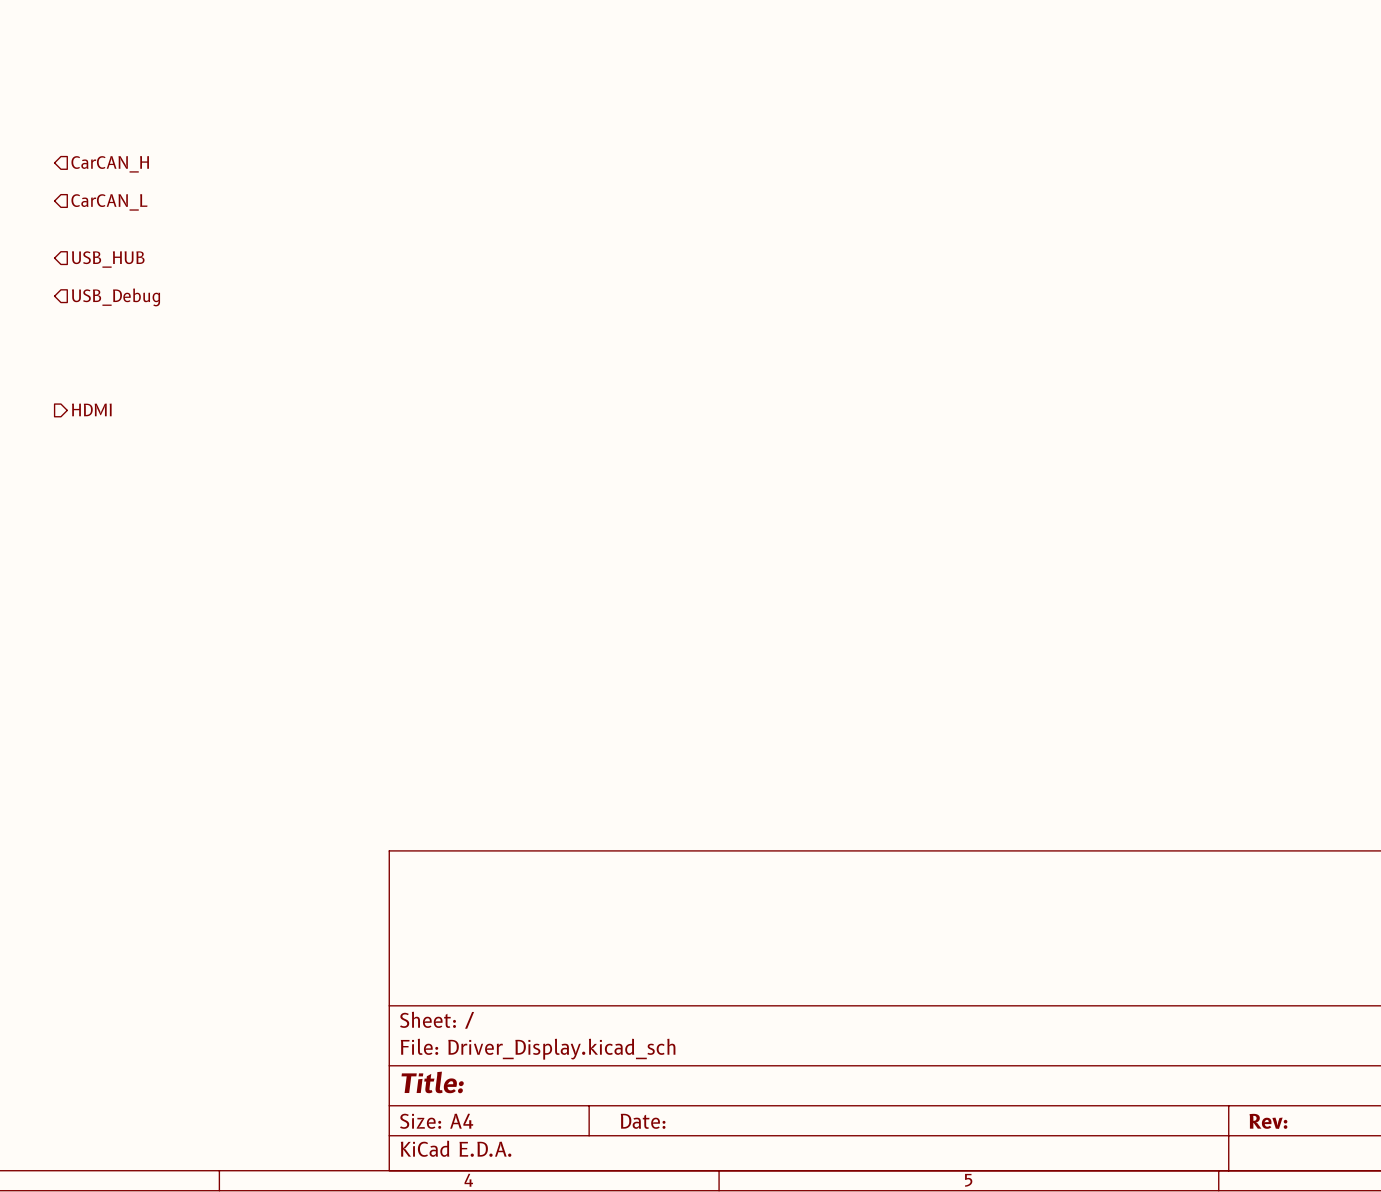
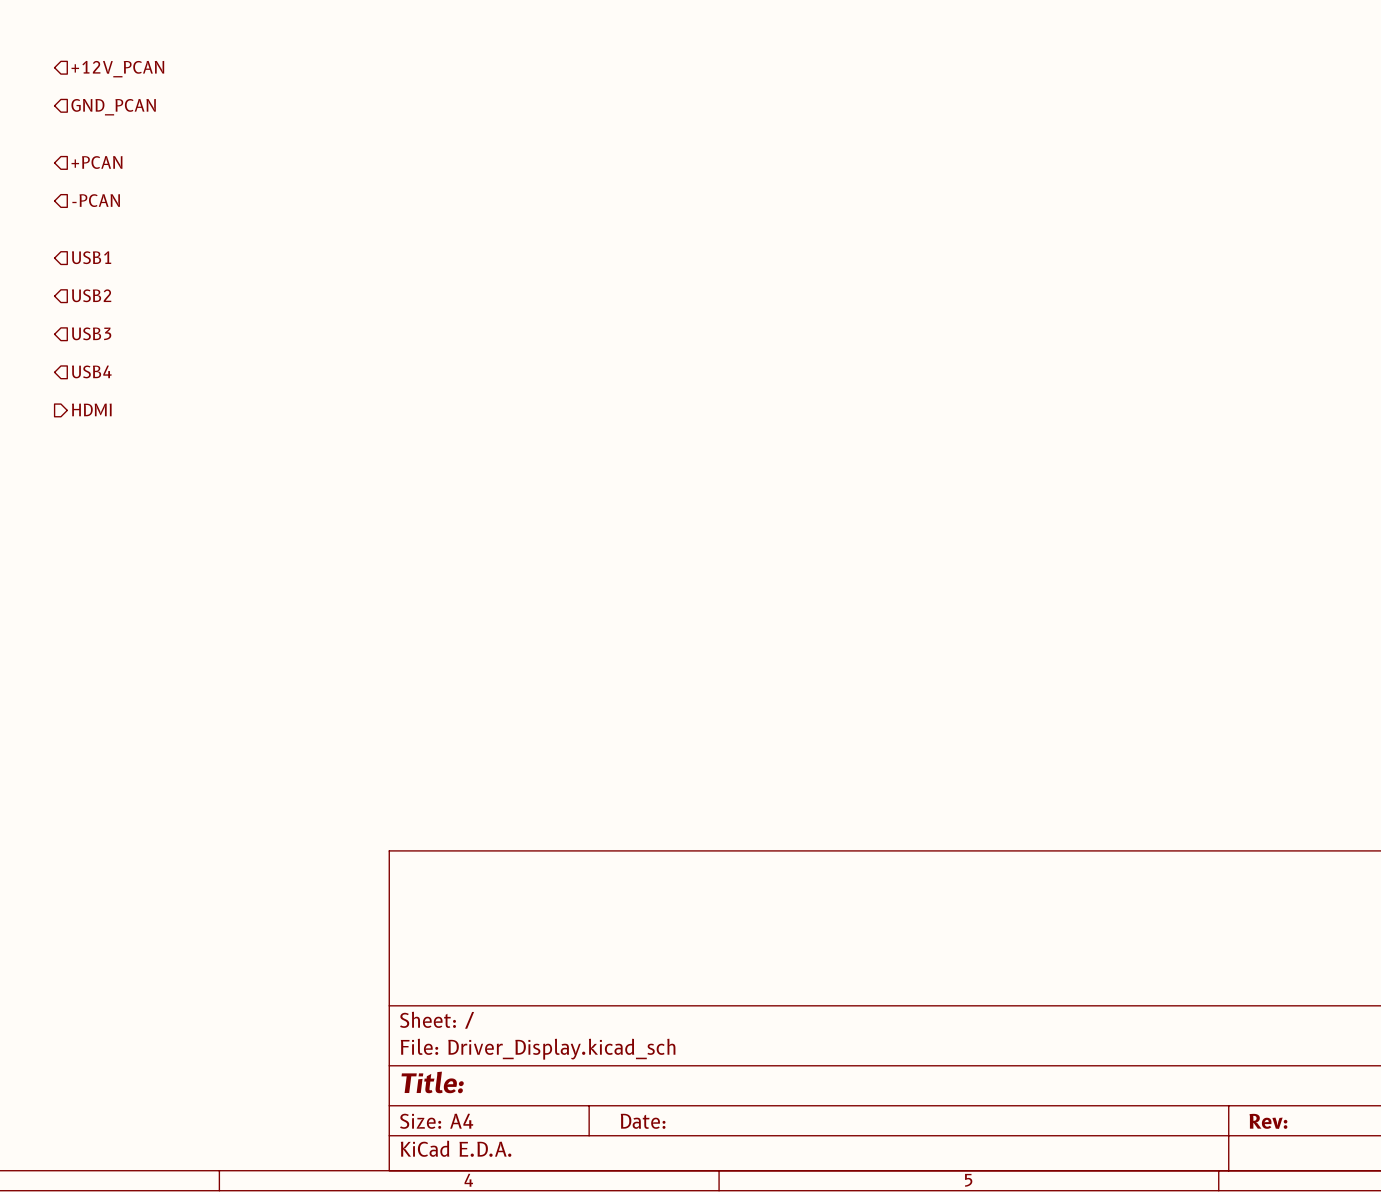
hierarchical label: none -> +12V_PCAN (117, 69)
hierarchical label: none -> GND_PCAN (113, 107)
hierarchical label: CarCAN_H (110, 164) -> +PCAN (96, 162)
hierarchical label: CarCAN_L (109, 202) -> -PCAN (96, 200)
hierarchical label: USB_HUB (108, 259) -> USB1 (91, 257)
hierarchical label: USB_Debug (116, 297) -> USB2 (91, 295)
hierarchical label: none -> USB3 (91, 333)
hierarchical label: none -> USB4 (91, 371)

